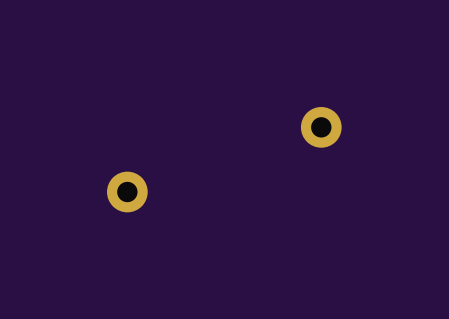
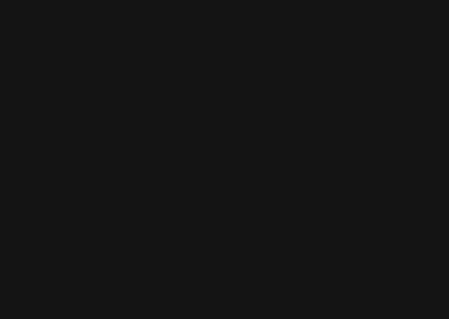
via: (321, 127) -> none
via: (127, 192) -> none

